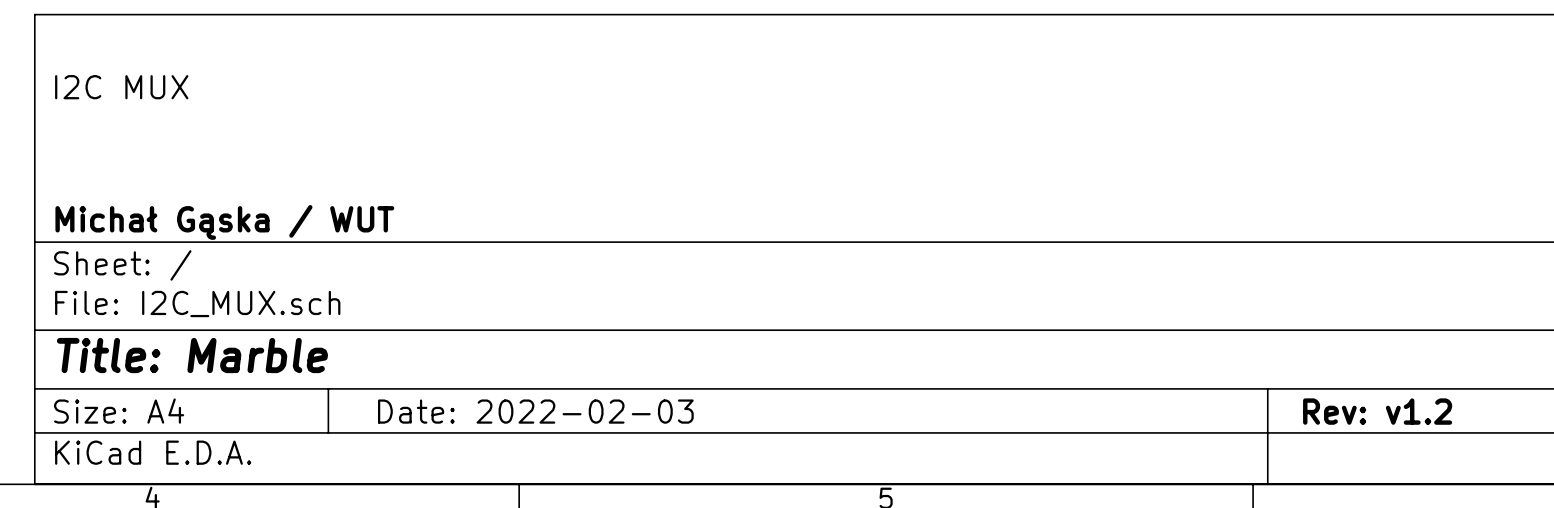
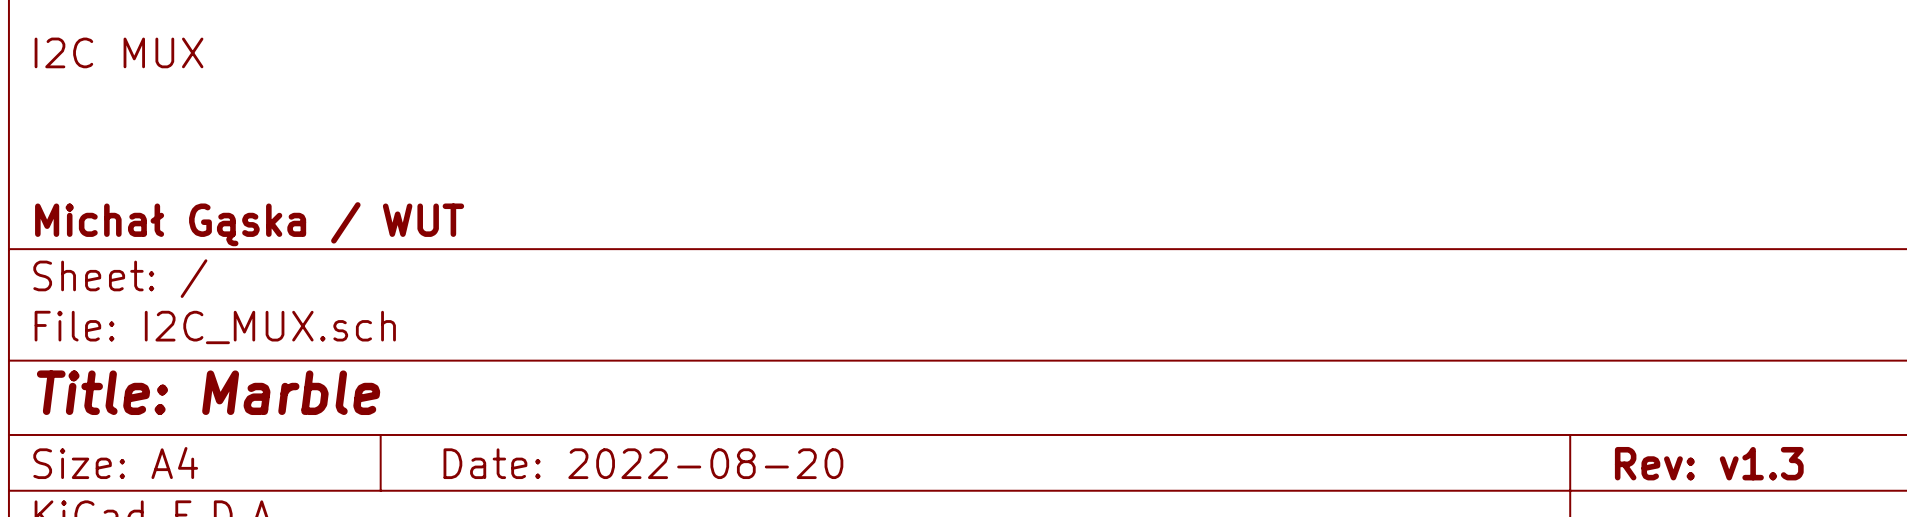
title block: Date: 2022-02-03 (535, 411) -> Date: 2022-08-20 (643, 463)
title block: Rev: v1.2 (1377, 411) -> Rev: v1.3 (1709, 463)

